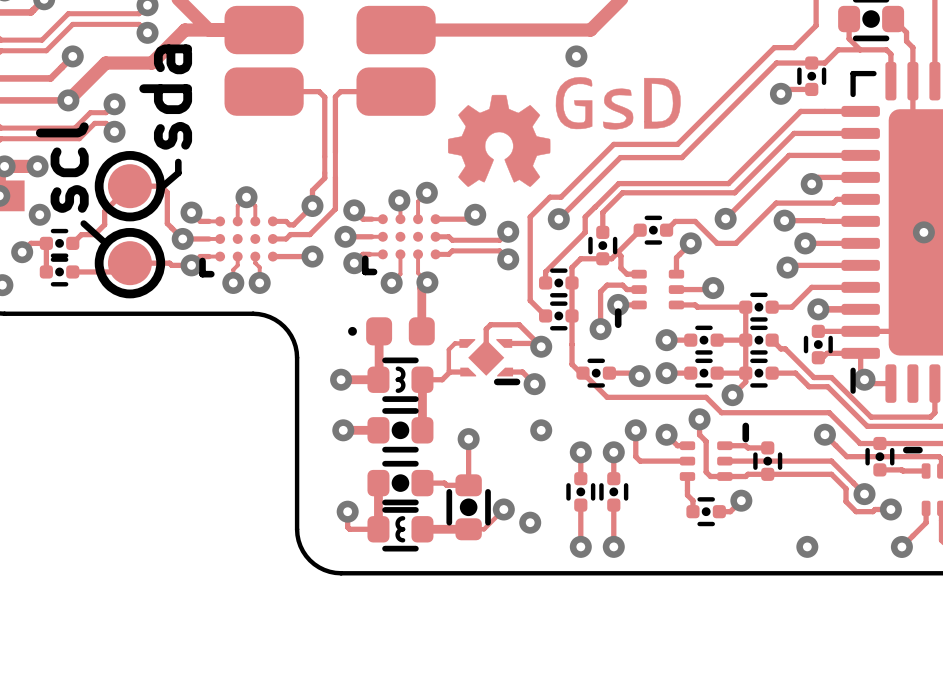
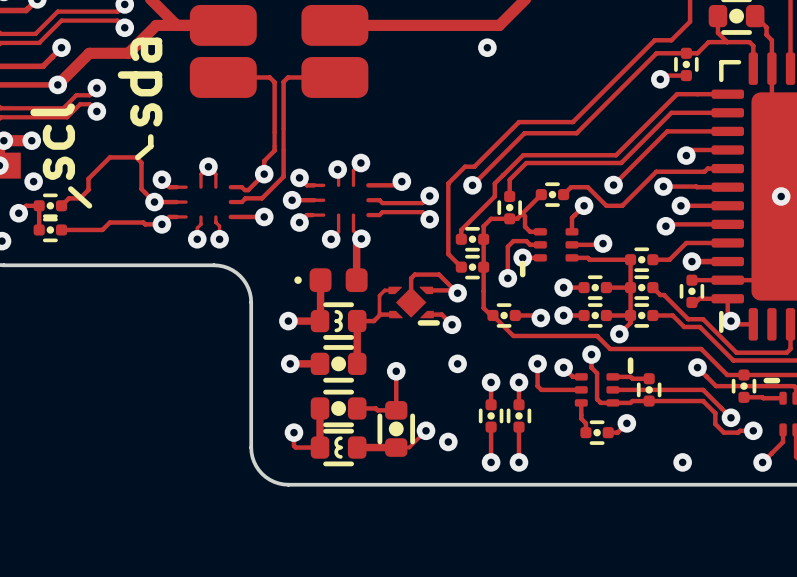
drawing: [447, 77, 681, 187] -> none
part: (129, 186) -> none
part: (401, 244) -> none
part: (238, 246) -> none
part: (129, 263) -> none

